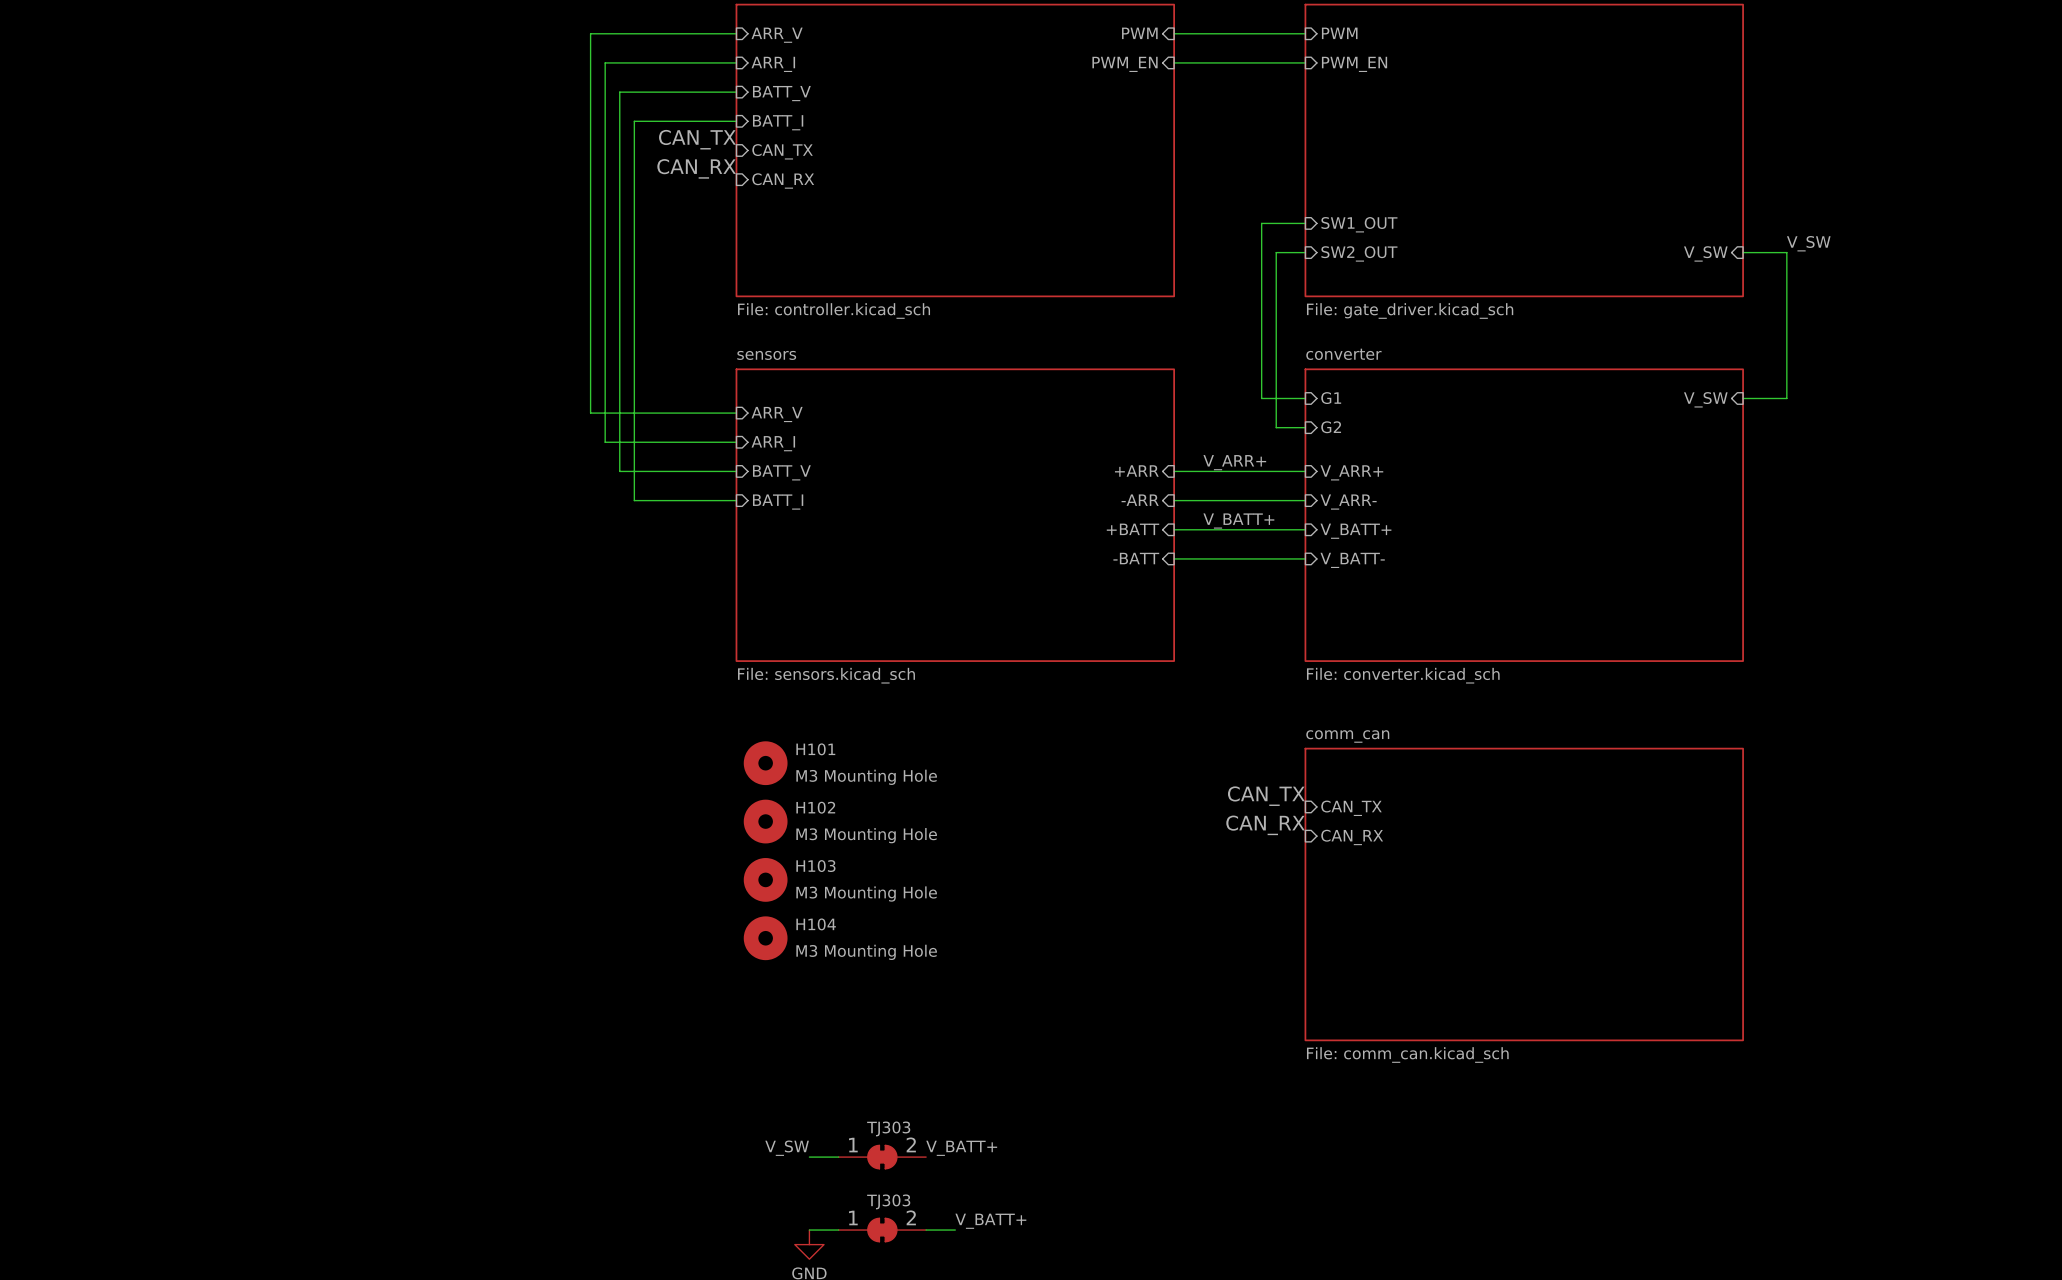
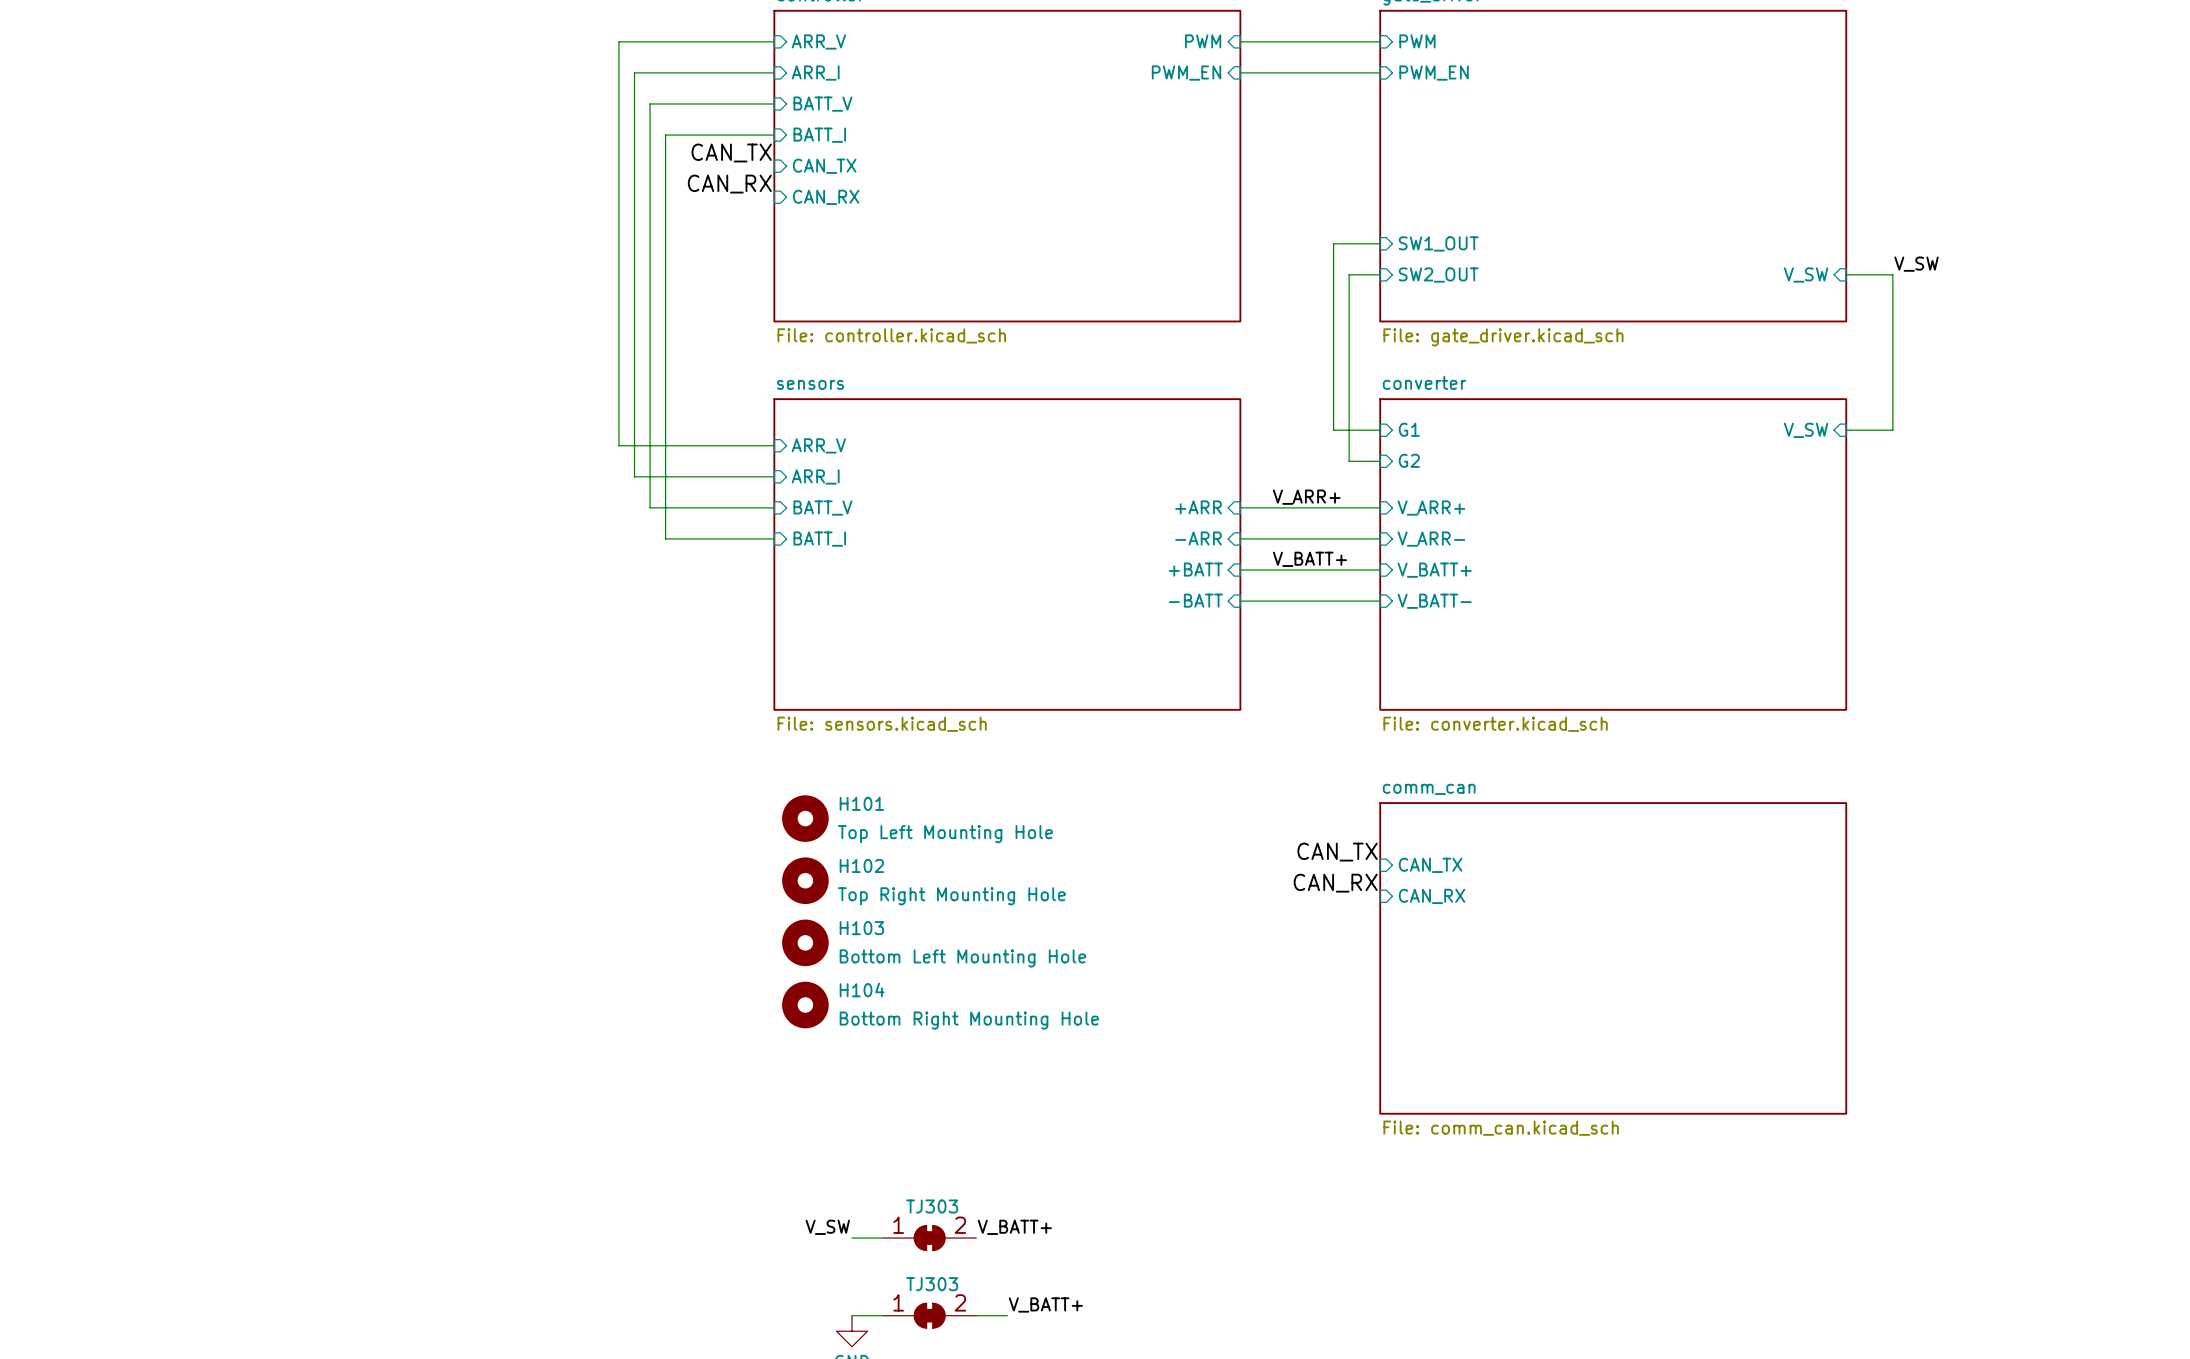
H101 value: M3 Mounting Hole (866, 777) -> Top Left Mounting Hole (945, 834)
H102 value: M3 Mounting Hole (866, 835) -> Top Right Mounting Hole (951, 896)
H103 value: M3 Mounting Hole (866, 894) -> Bottom Left Mounting Hole (962, 958)
H104 value: M3 Mounting Hole (866, 952) -> Bottom Right Mounting Hole (969, 1020)

